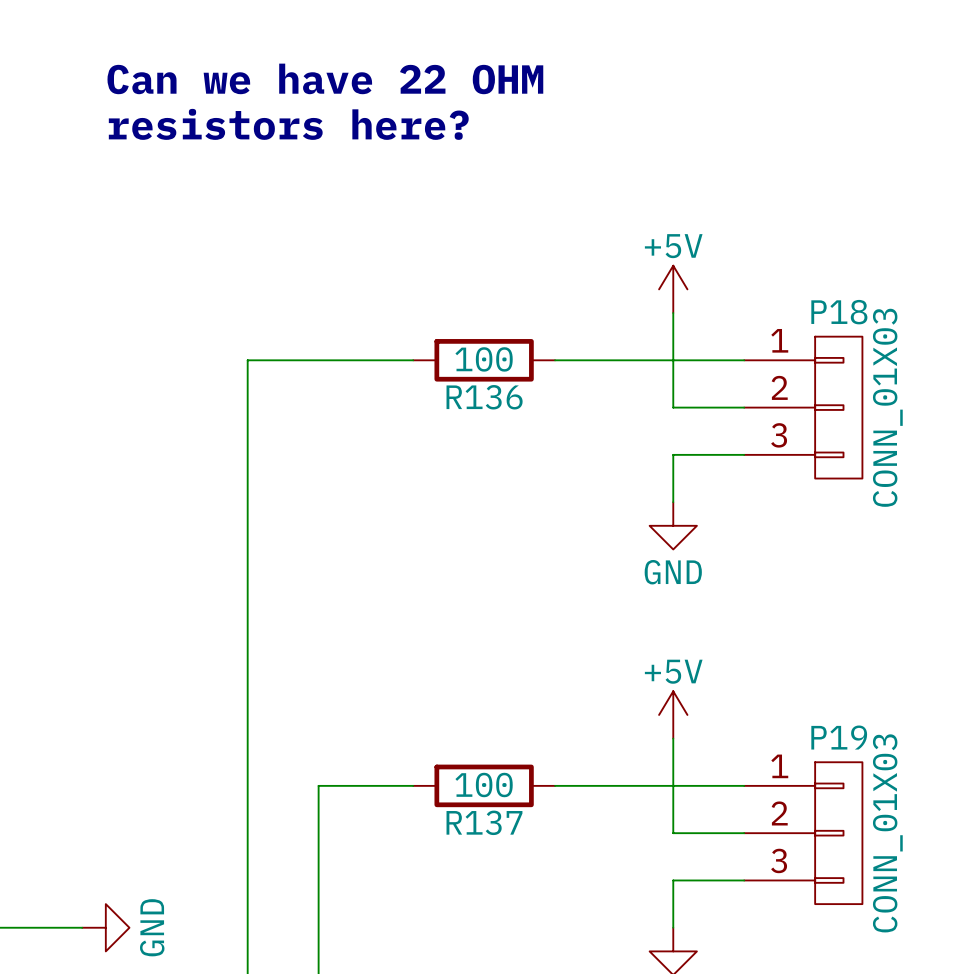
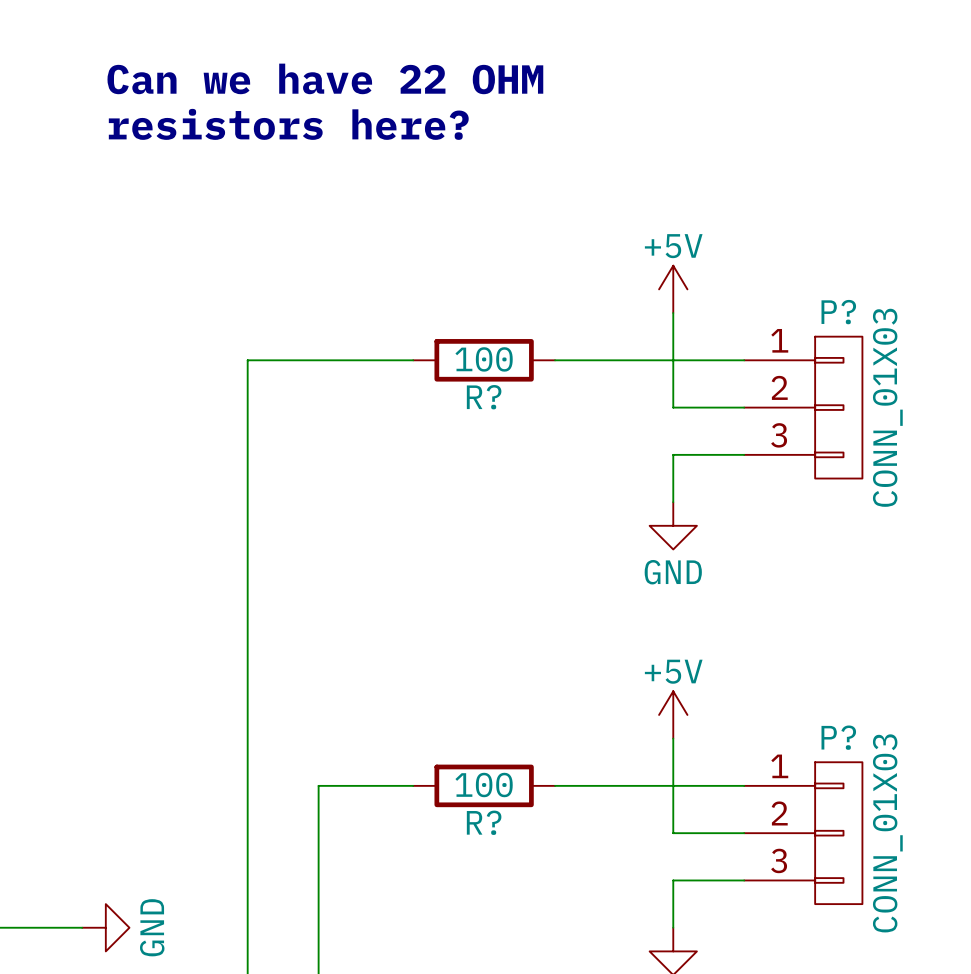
P18 name: P18 (839, 312) -> P? (838, 312)
R136 name: R136 (484, 397) -> R? (484, 397)
P19 name: P19 (839, 737) -> P? (838, 737)
R137 name: R137 (484, 822) -> R? (484, 822)

